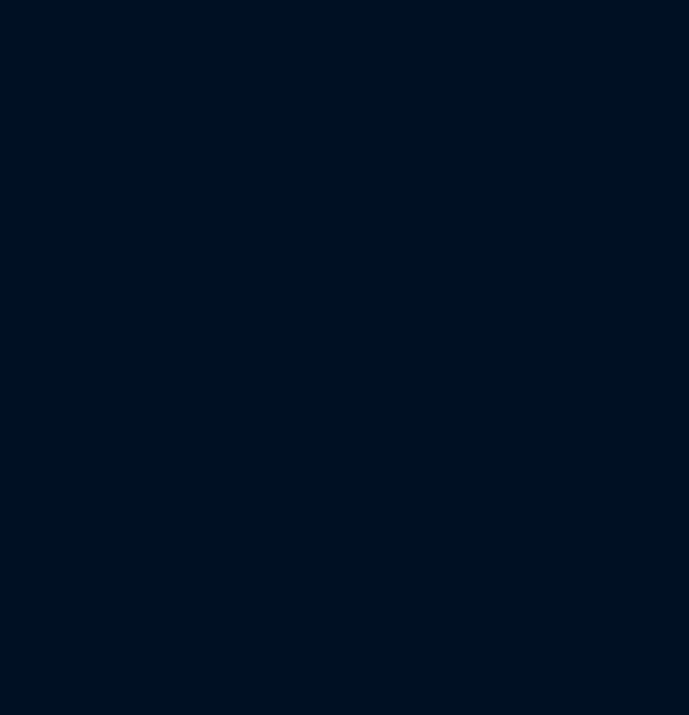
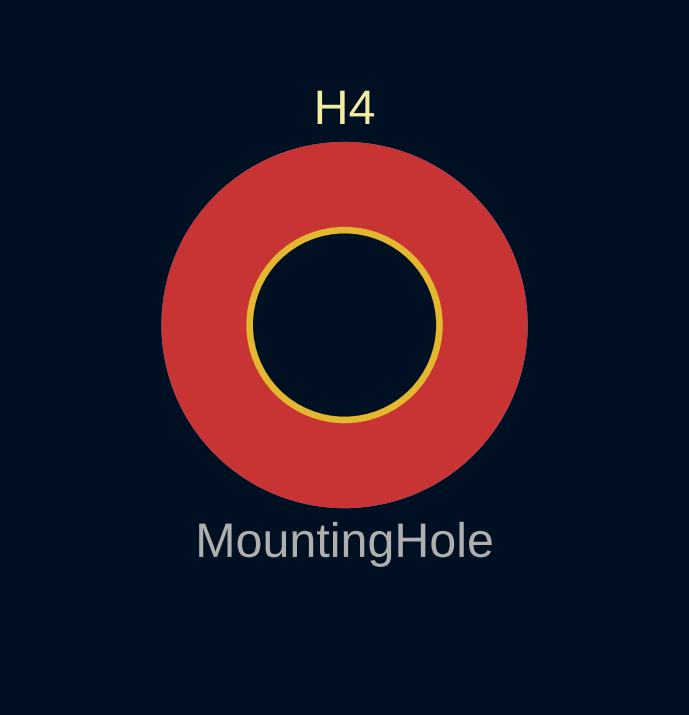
H4: none -> MountingHole (344, 325)

